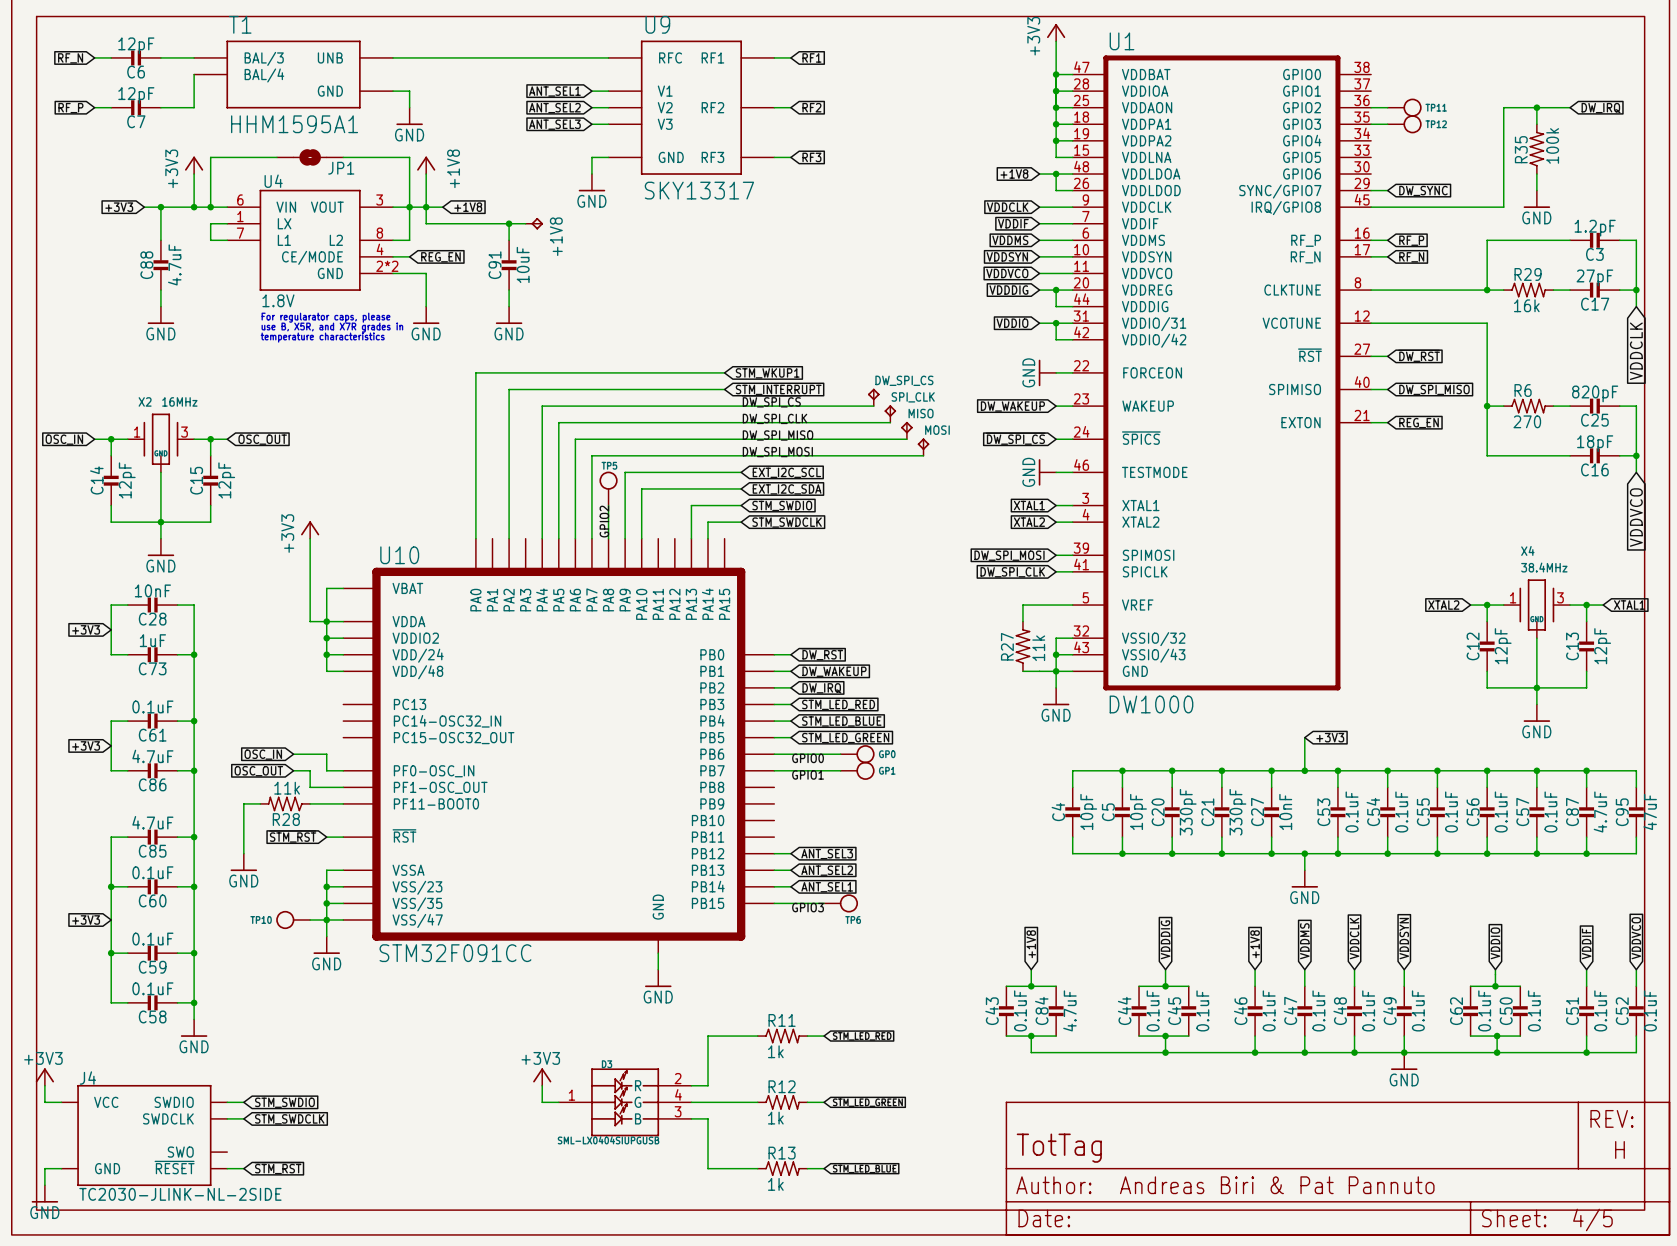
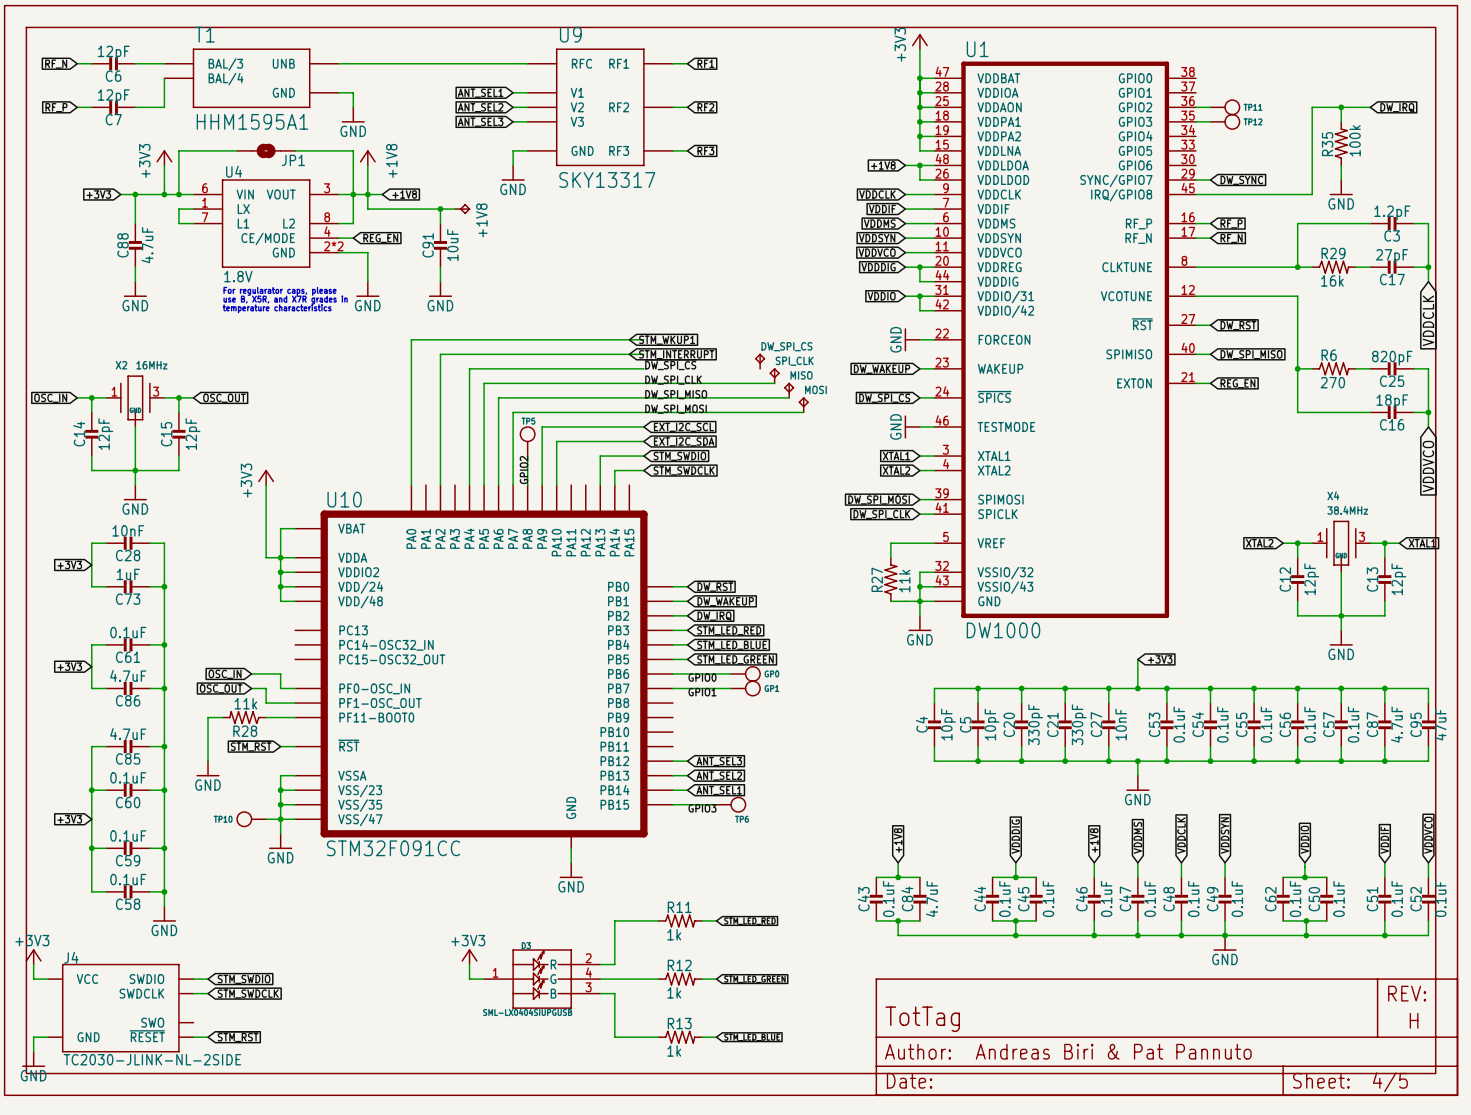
wire: none -> (629, 339) (643, 339)
wire: none -> (629, 354) (643, 354)
wire: (741, 406) (873, 406) -> none

